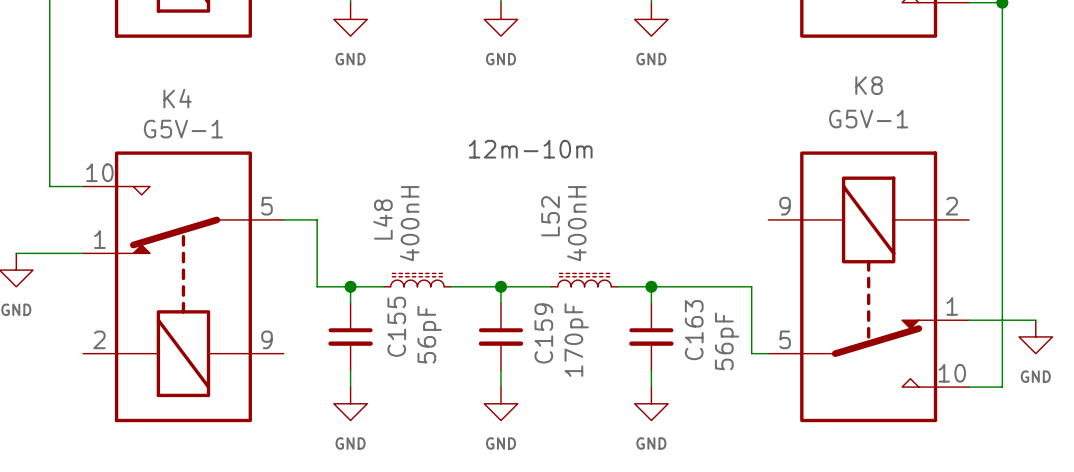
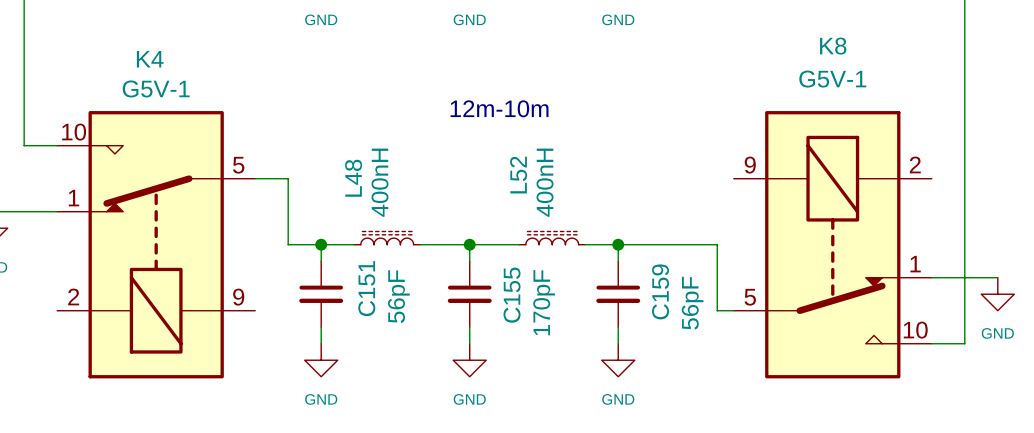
C155 name: C155 (396, 326) -> C151 (366, 288)
C163 name: C163 (694, 330) -> C159 (660, 291)
C159 name: C159 (543, 333) -> C155 (512, 295)

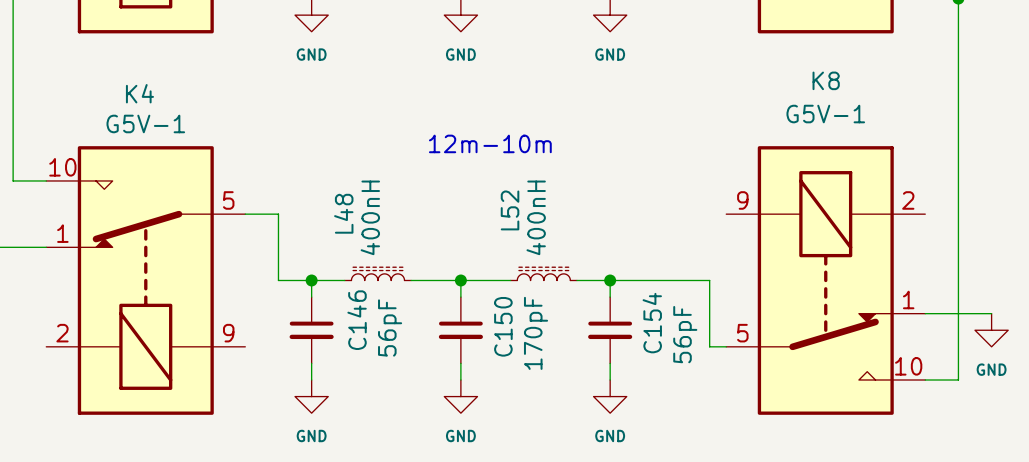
C151 name: C151 (366, 288) -> C146 (357, 320)
C159 name: C159 (660, 291) -> C154 (652, 323)
C155 name: C155 (512, 295) -> C150 (503, 326)

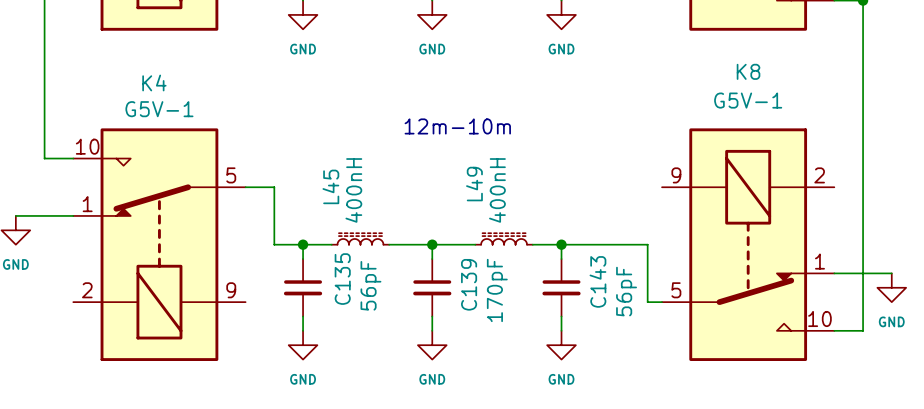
L52 name: L52 (510, 210) -> L49 (474, 184)
L48 name: L48 (343, 213) -> L45 (330, 186)
C146 name: C146 (357, 320) -> C135 (342, 279)
C154 name: C154 (652, 323) -> C143 (597, 281)
C150 name: C150 (503, 326) -> C139 (469, 284)

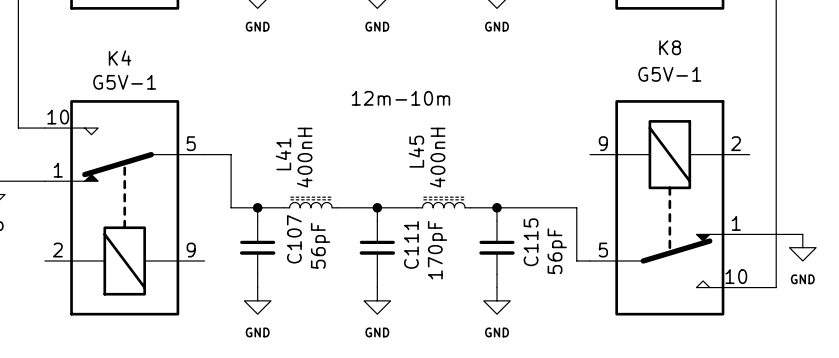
L49 name: L49 (474, 184) -> L45 (416, 151)
L45 name: L45 (330, 186) -> L41 (283, 154)
C135 name: C135 (342, 279) -> C107 (294, 239)
C143 name: C143 (597, 281) -> C115 (531, 242)
C139 name: C139 (469, 284) -> C111 (411, 244)

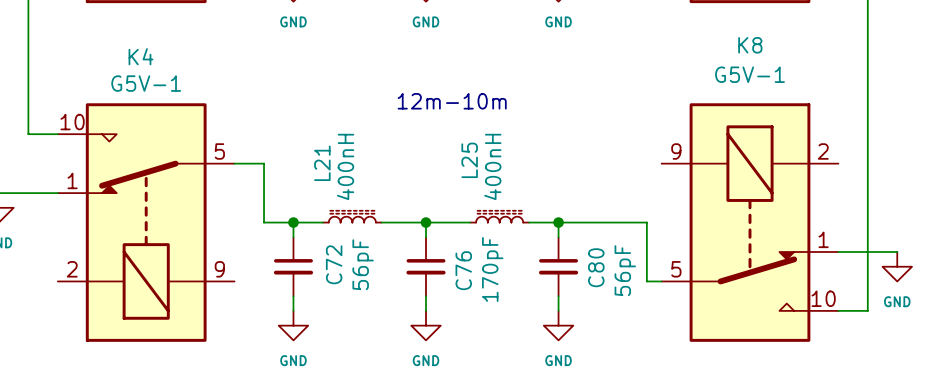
L45 name: L45 (416, 151) -> L25 (469, 160)
L41 name: L41 (283, 154) -> L21 (322, 163)
C107 name: C107 (294, 239) -> C72 (334, 264)
C115 name: C115 (531, 242) -> C80 (596, 267)
C111 name: C111 (411, 244) -> C76 (463, 270)

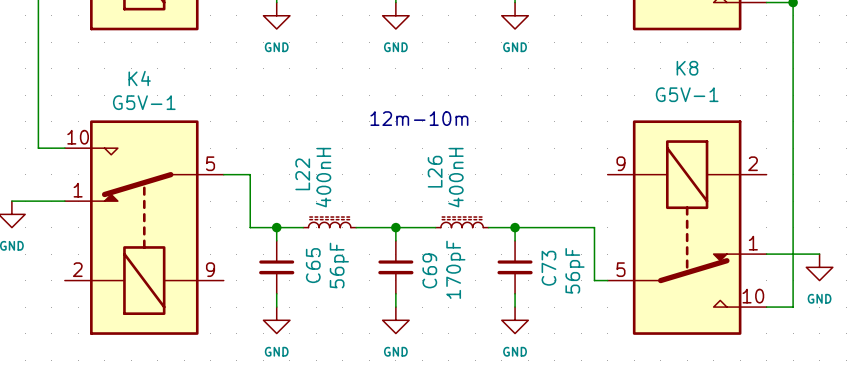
L25 name: L25 (469, 160) -> L26 (435, 171)
L21 name: L21 (322, 163) -> L22 (302, 174)
C72 name: C72 (334, 264) -> C65 (313, 265)
C80 name: C80 (596, 267) -> C73 (548, 268)
C76 name: C76 (463, 270) -> C69 (429, 270)

